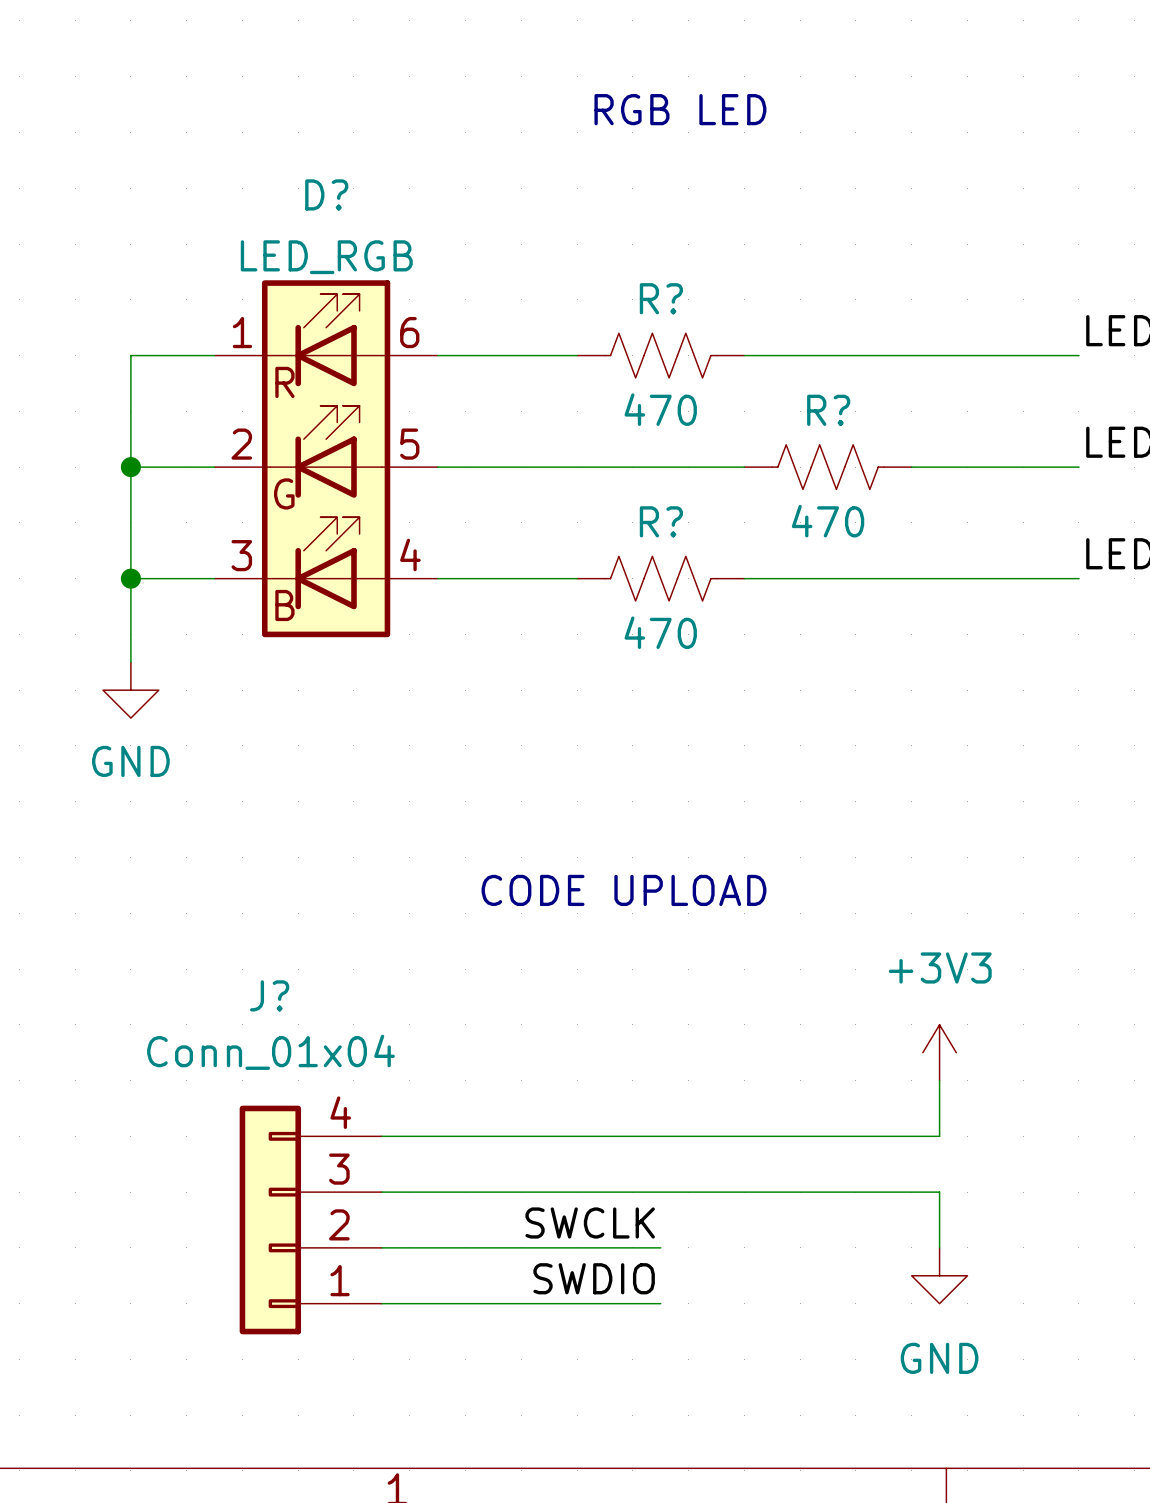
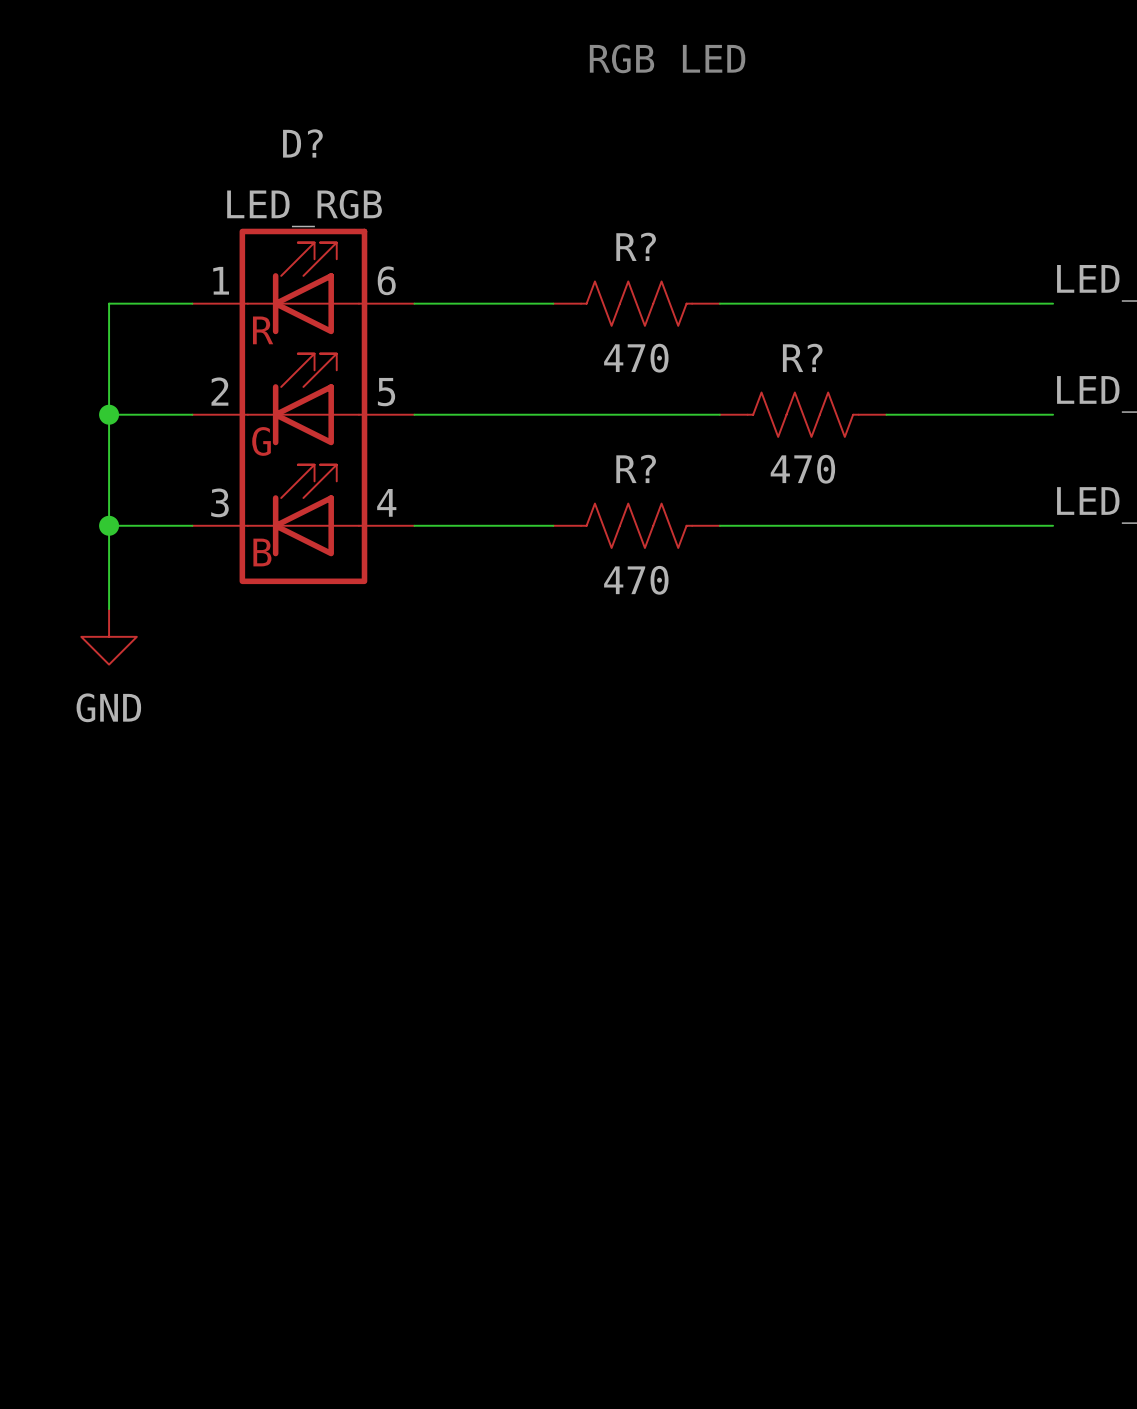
text: CODE UPLOAD (624, 890) -> none
power symbol: +3V3 (939, 1052) -> none
wire: (939, 1080) (939, 1136) (381, 1136) -> none
wire: (381, 1192) (939, 1192) (939, 1247) -> none
J?: Conn_01x04 (310, 1220) -> none
label: SWCLK (590, 1223) -> none
wire: (381, 1247) (660, 1247) -> none
power symbol: GND (939, 1275) -> none
label: SWDIO (594, 1278) -> none
wire: (381, 1303) (660, 1303) -> none

